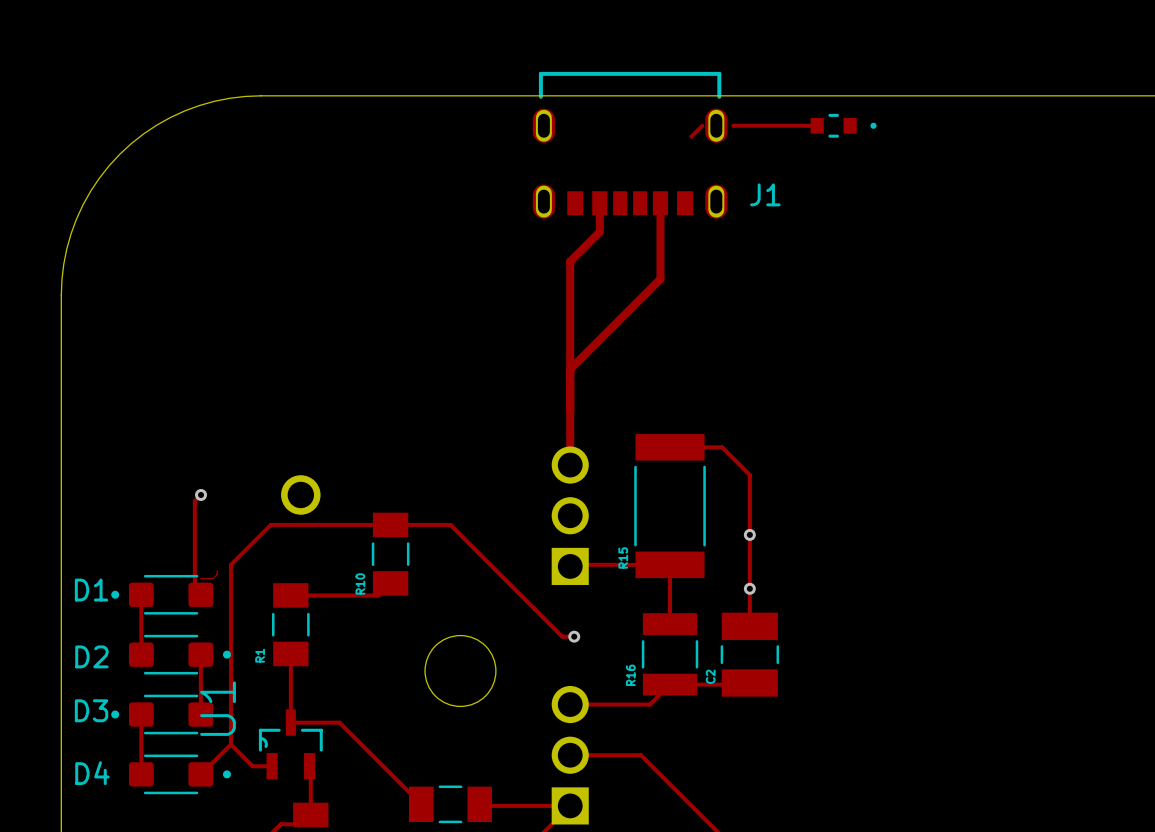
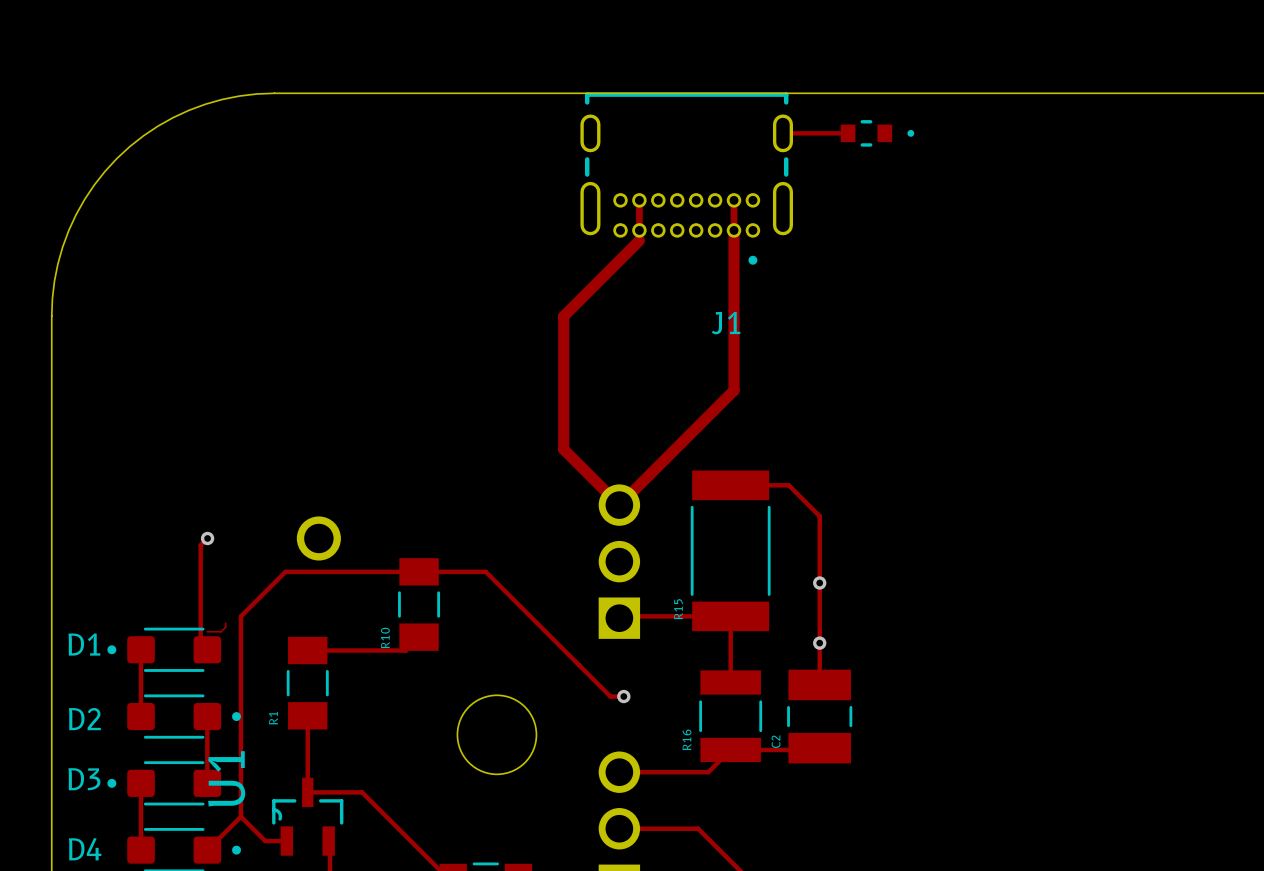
J1 footprint: [532, 71, 728, 219] -> [580, 92, 793, 265]
track: (702, 125) (691, 136) -> none
track: (733, 125) (817, 125) -> none
part position: (843, 125) -> (877, 133)
track: none -> (782, 133) (848, 133)
track: none -> (639, 200) (639, 240) (563, 316) (563, 449) (619, 505) (734, 390) (734, 200)
J1 name position: J1 (765, 194) -> J1 (726, 323)
track: (599, 203) (599, 231) (570, 261) (570, 465) -> none
track: (660, 203) (660, 279) (570, 369) (570, 363) -> none

